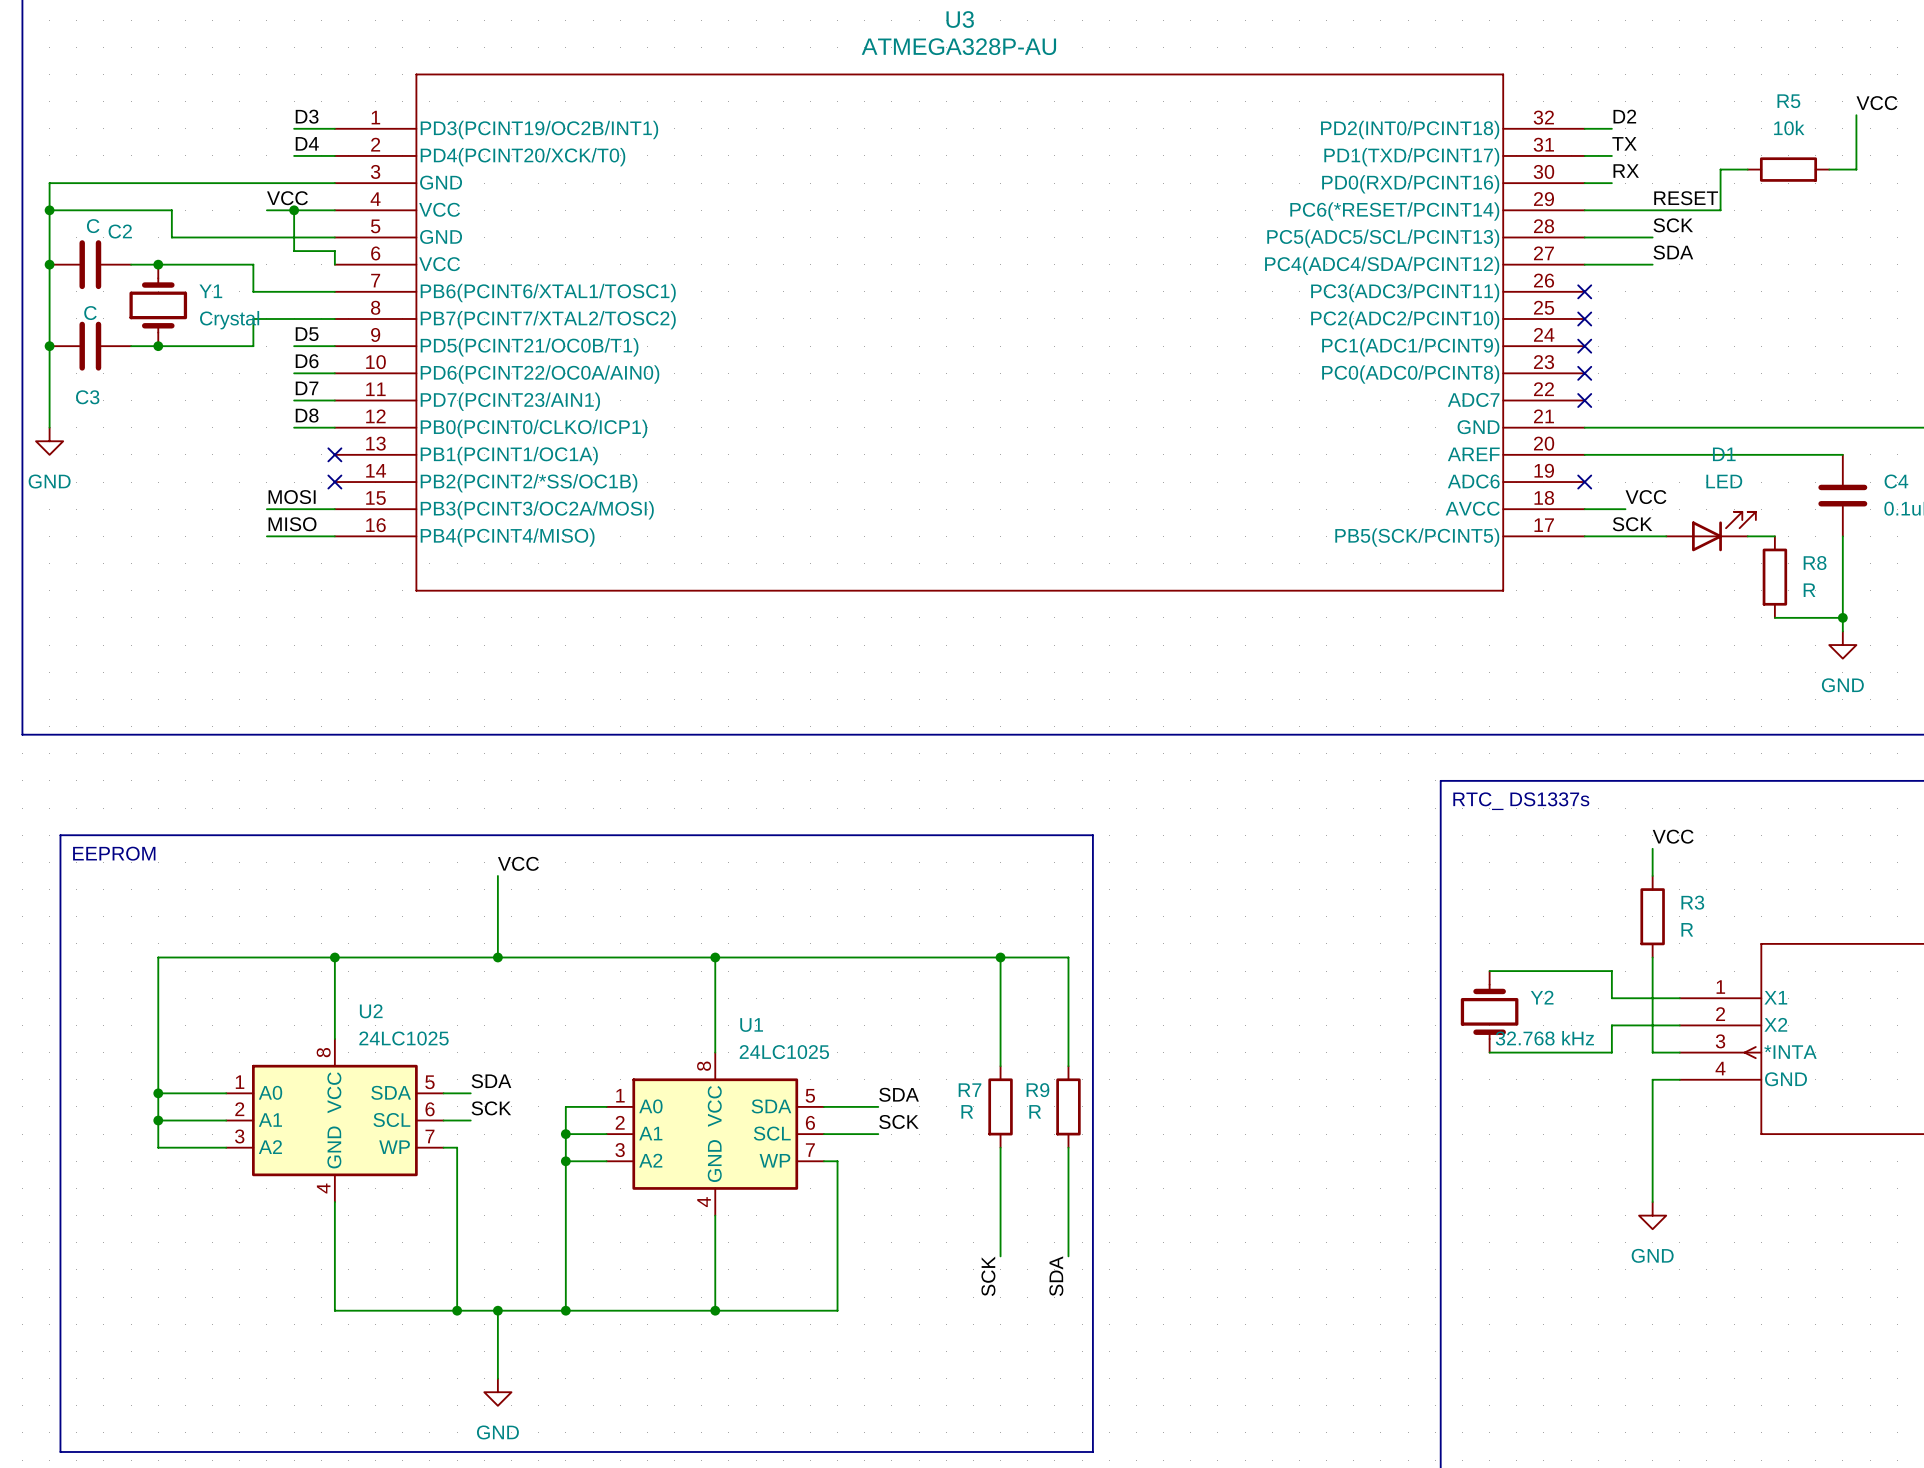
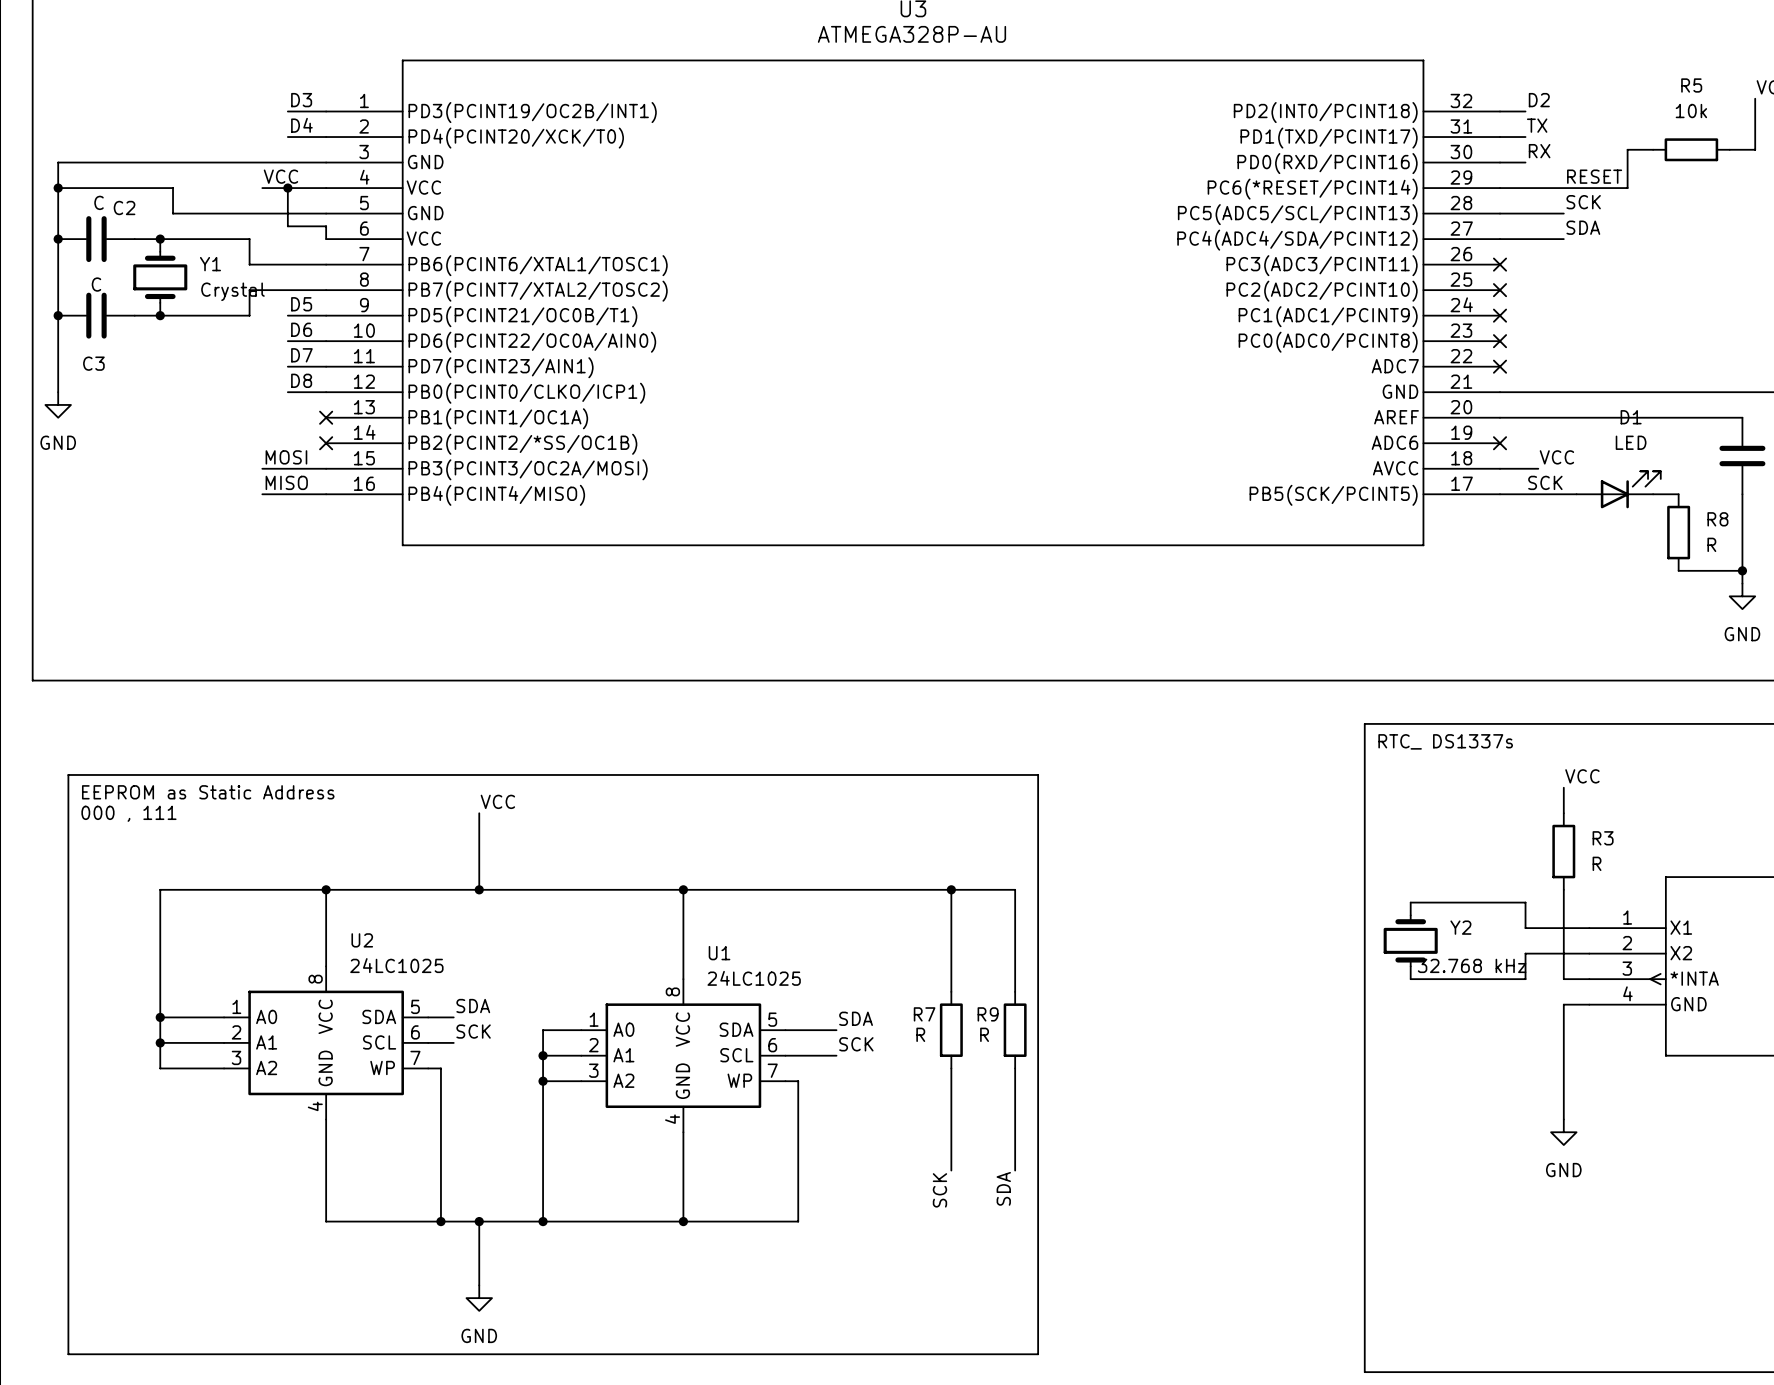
text: EEPROM (114, 853) -> EEPROM as Static Address (208, 792)
text: none -> 000 , 111 (128, 813)

